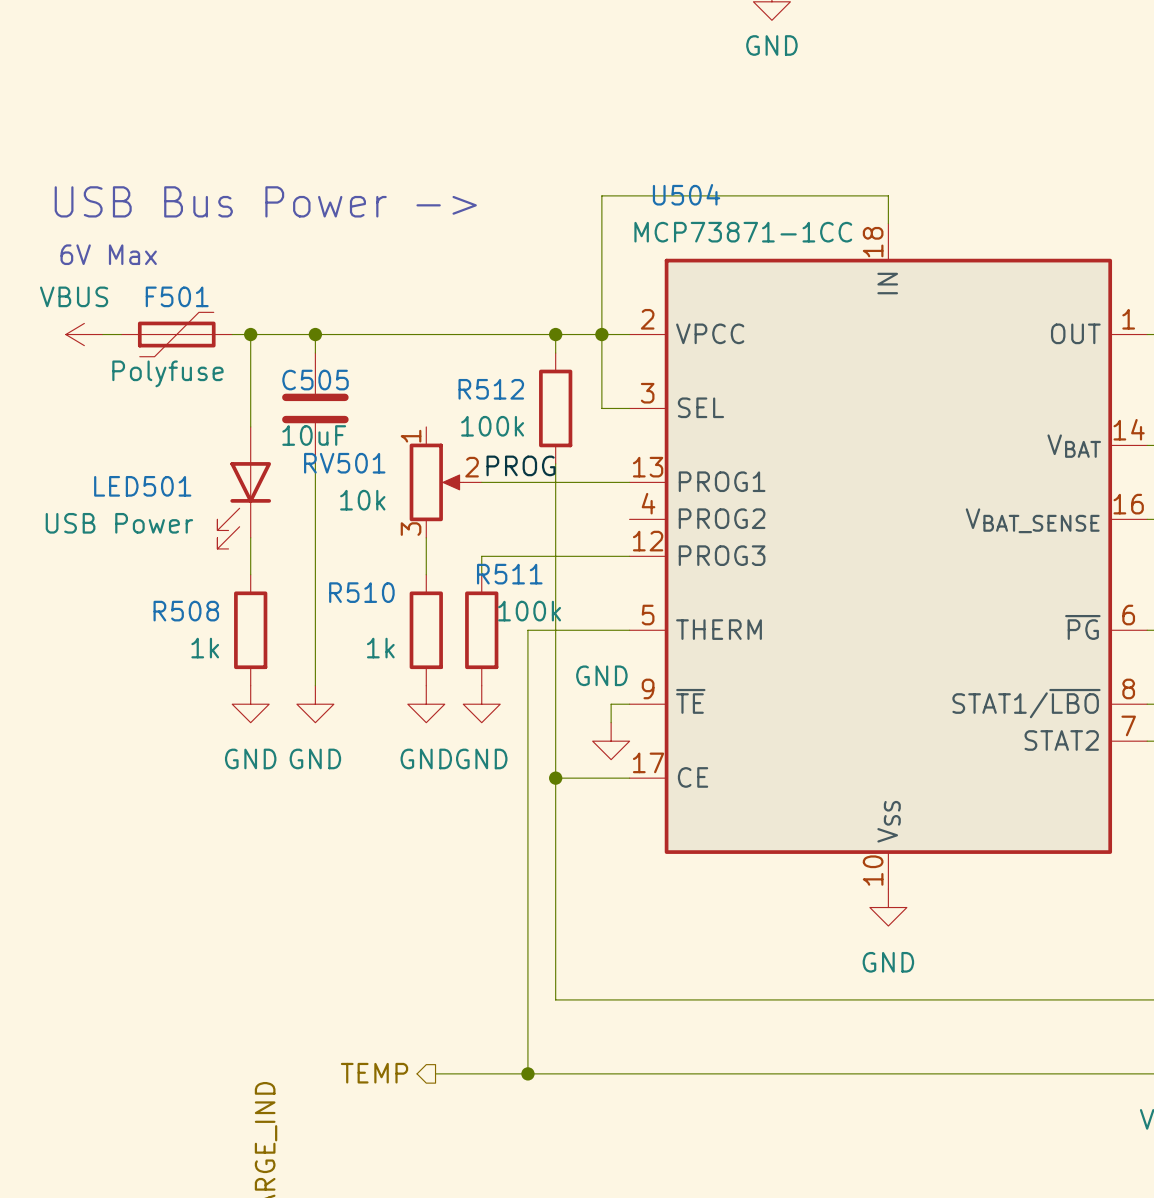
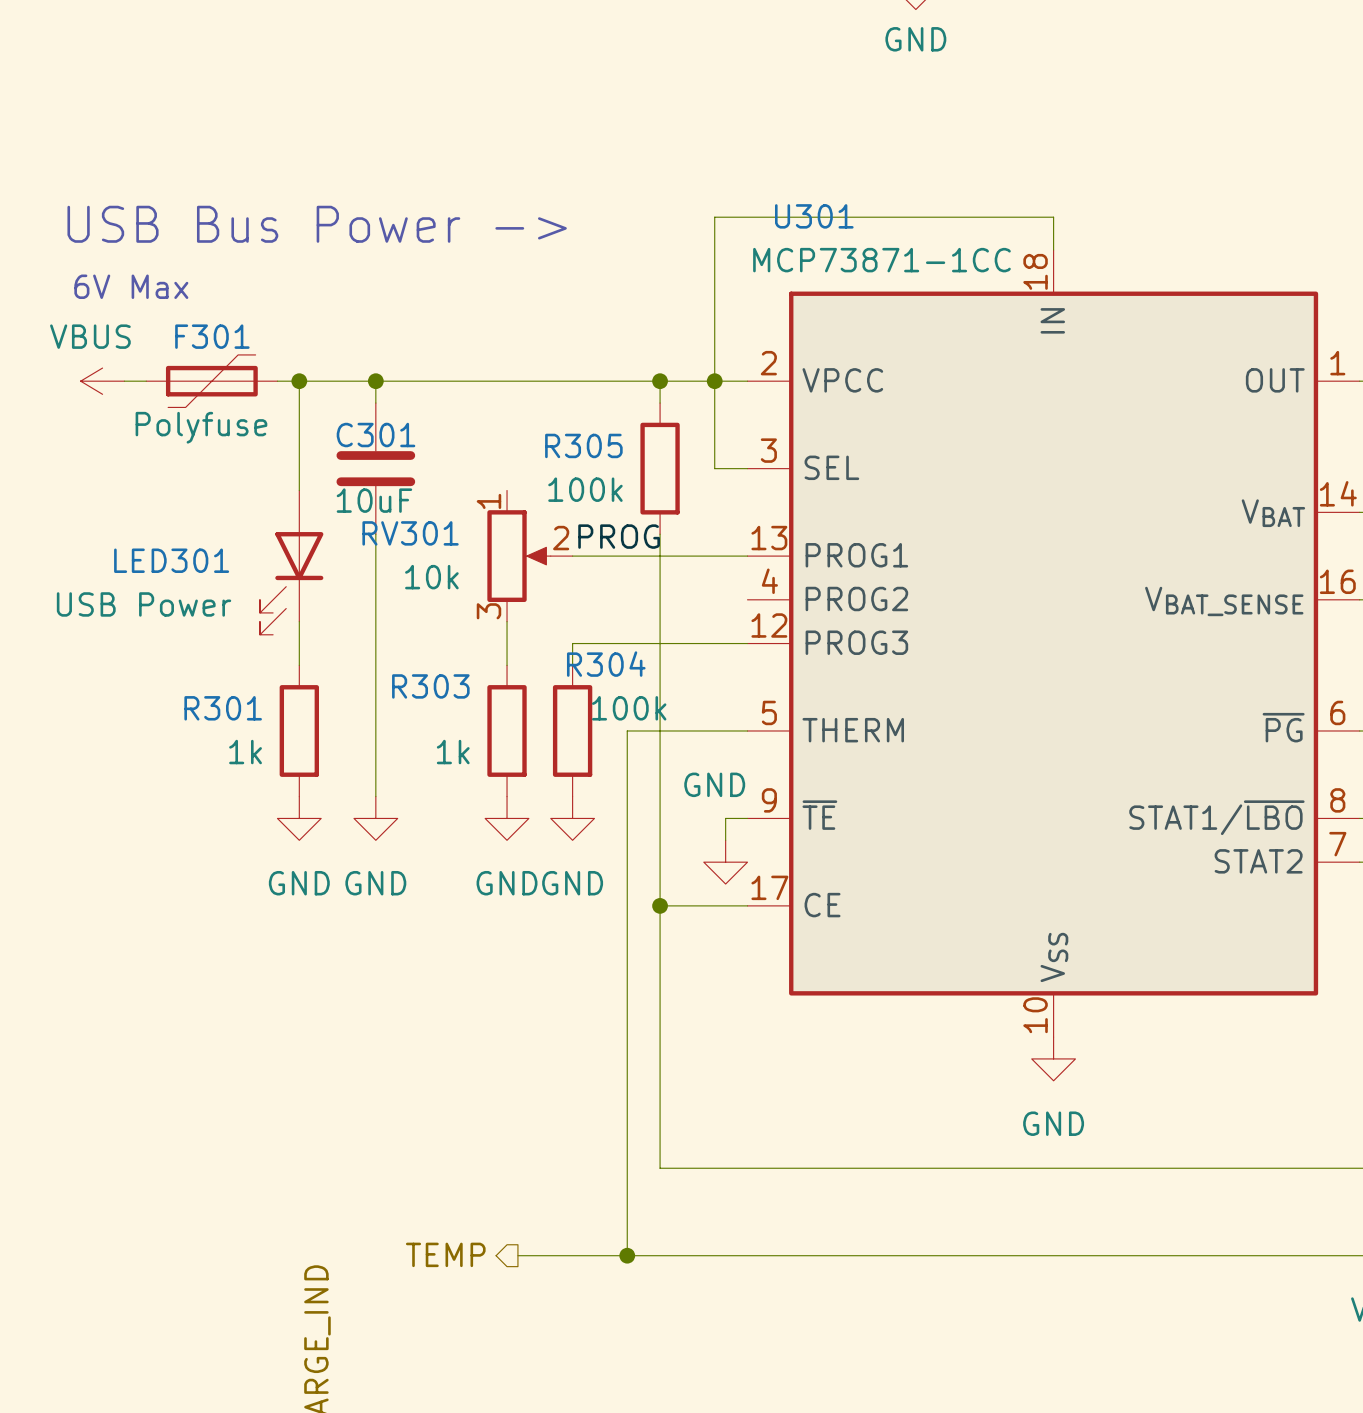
U504 name: U504 (686, 194) -> U301 (814, 216)
F501 name: F501 (177, 296) -> F301 (212, 336)
C505 name: C505 (315, 380) -> C301 (376, 435)
R512 name: R512 (491, 389) -> R305 (583, 445)
RV501 name: RV501 (344, 463) -> RV301 (410, 533)
LED501 name: LED501 (142, 486) -> LED301 (171, 560)
R511 name: R511 (509, 574) -> R304 (606, 664)
R510 name: R510 (361, 592) -> R303 (430, 686)
R508 name: R508 (186, 611) -> R301 (223, 708)

